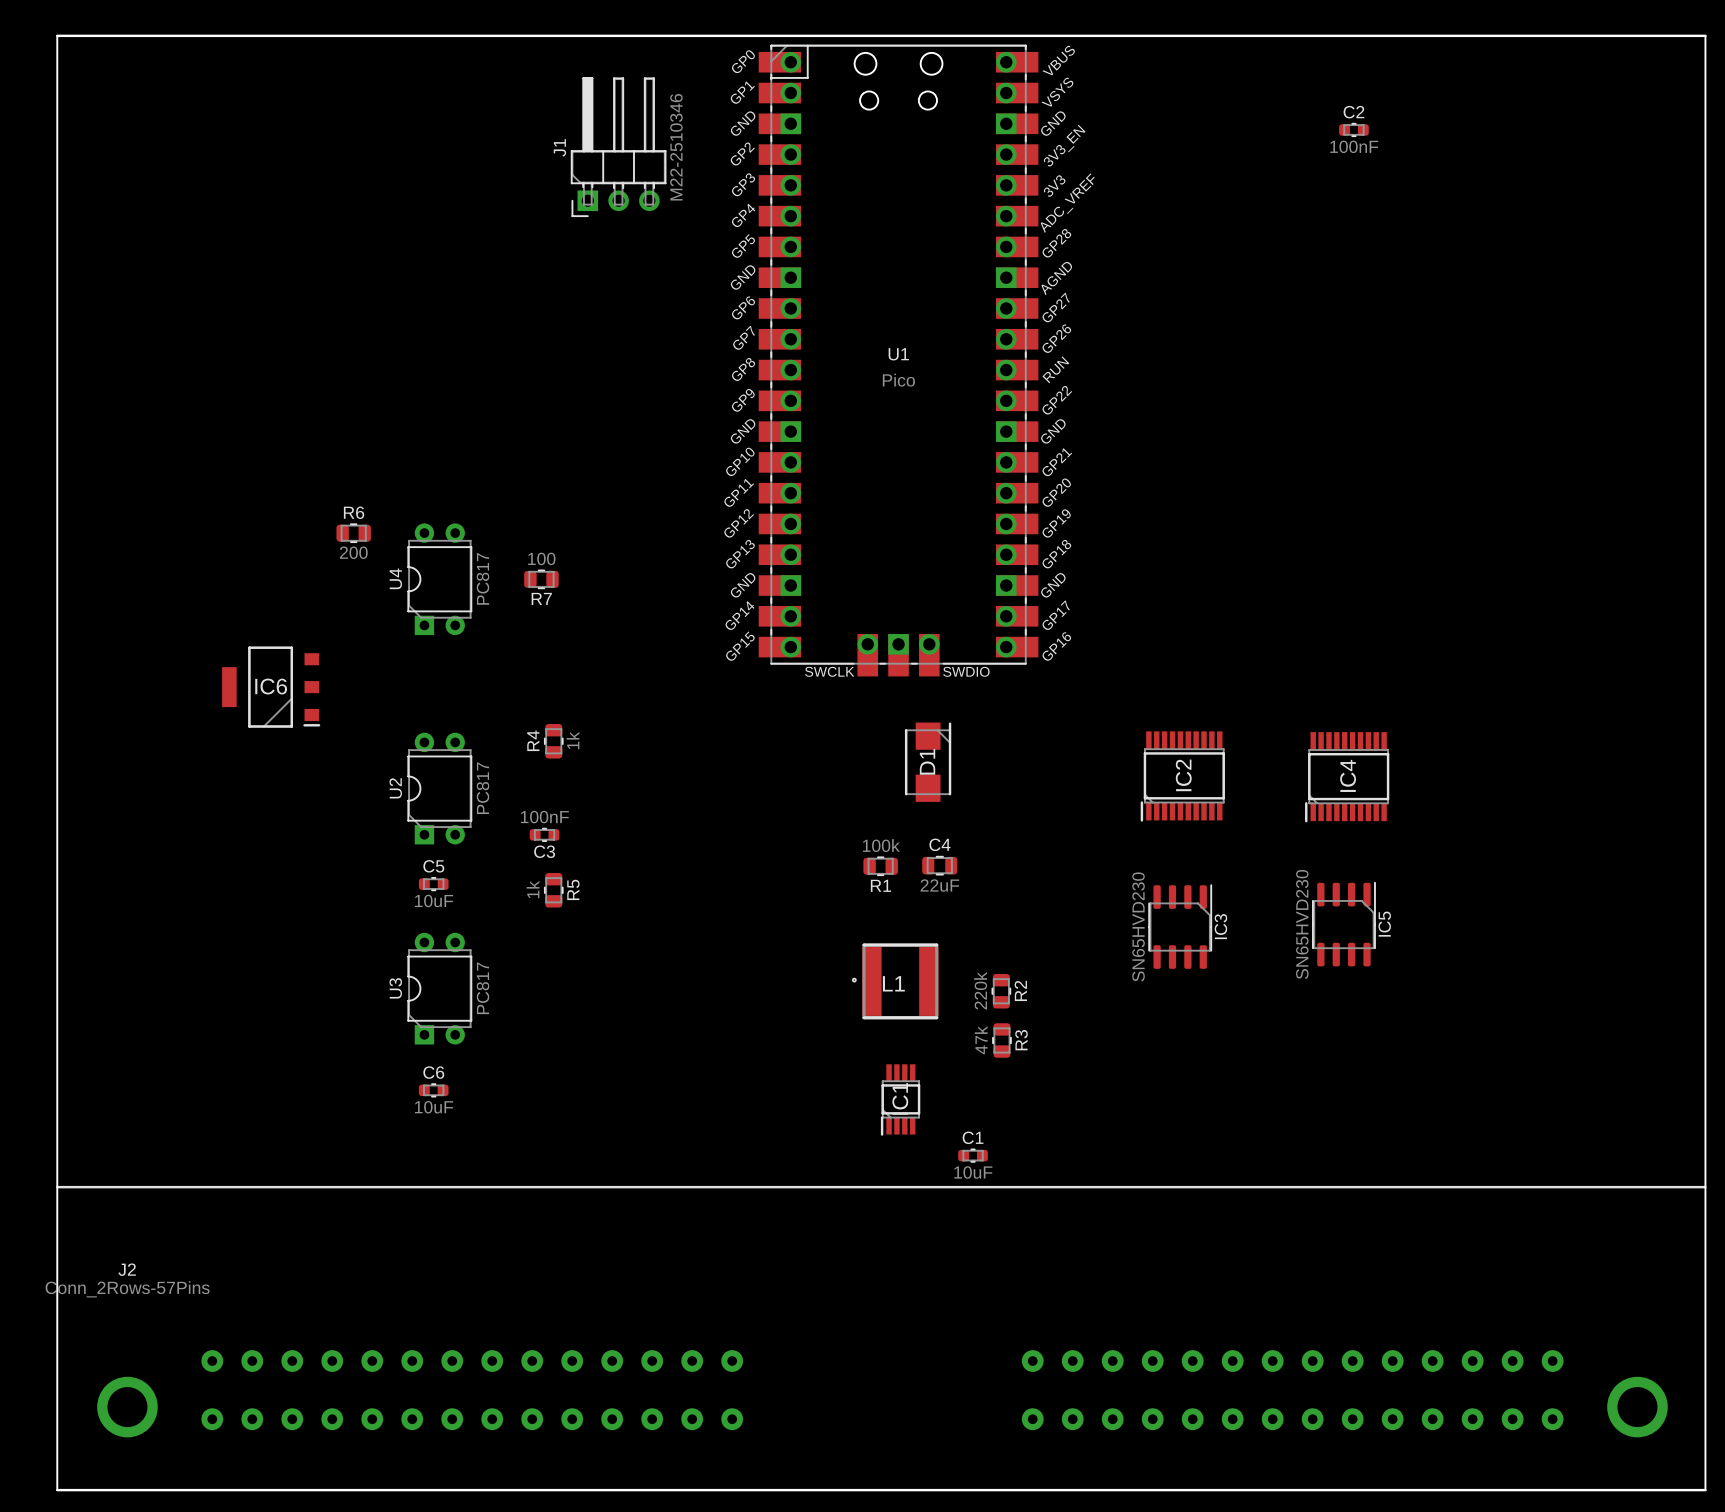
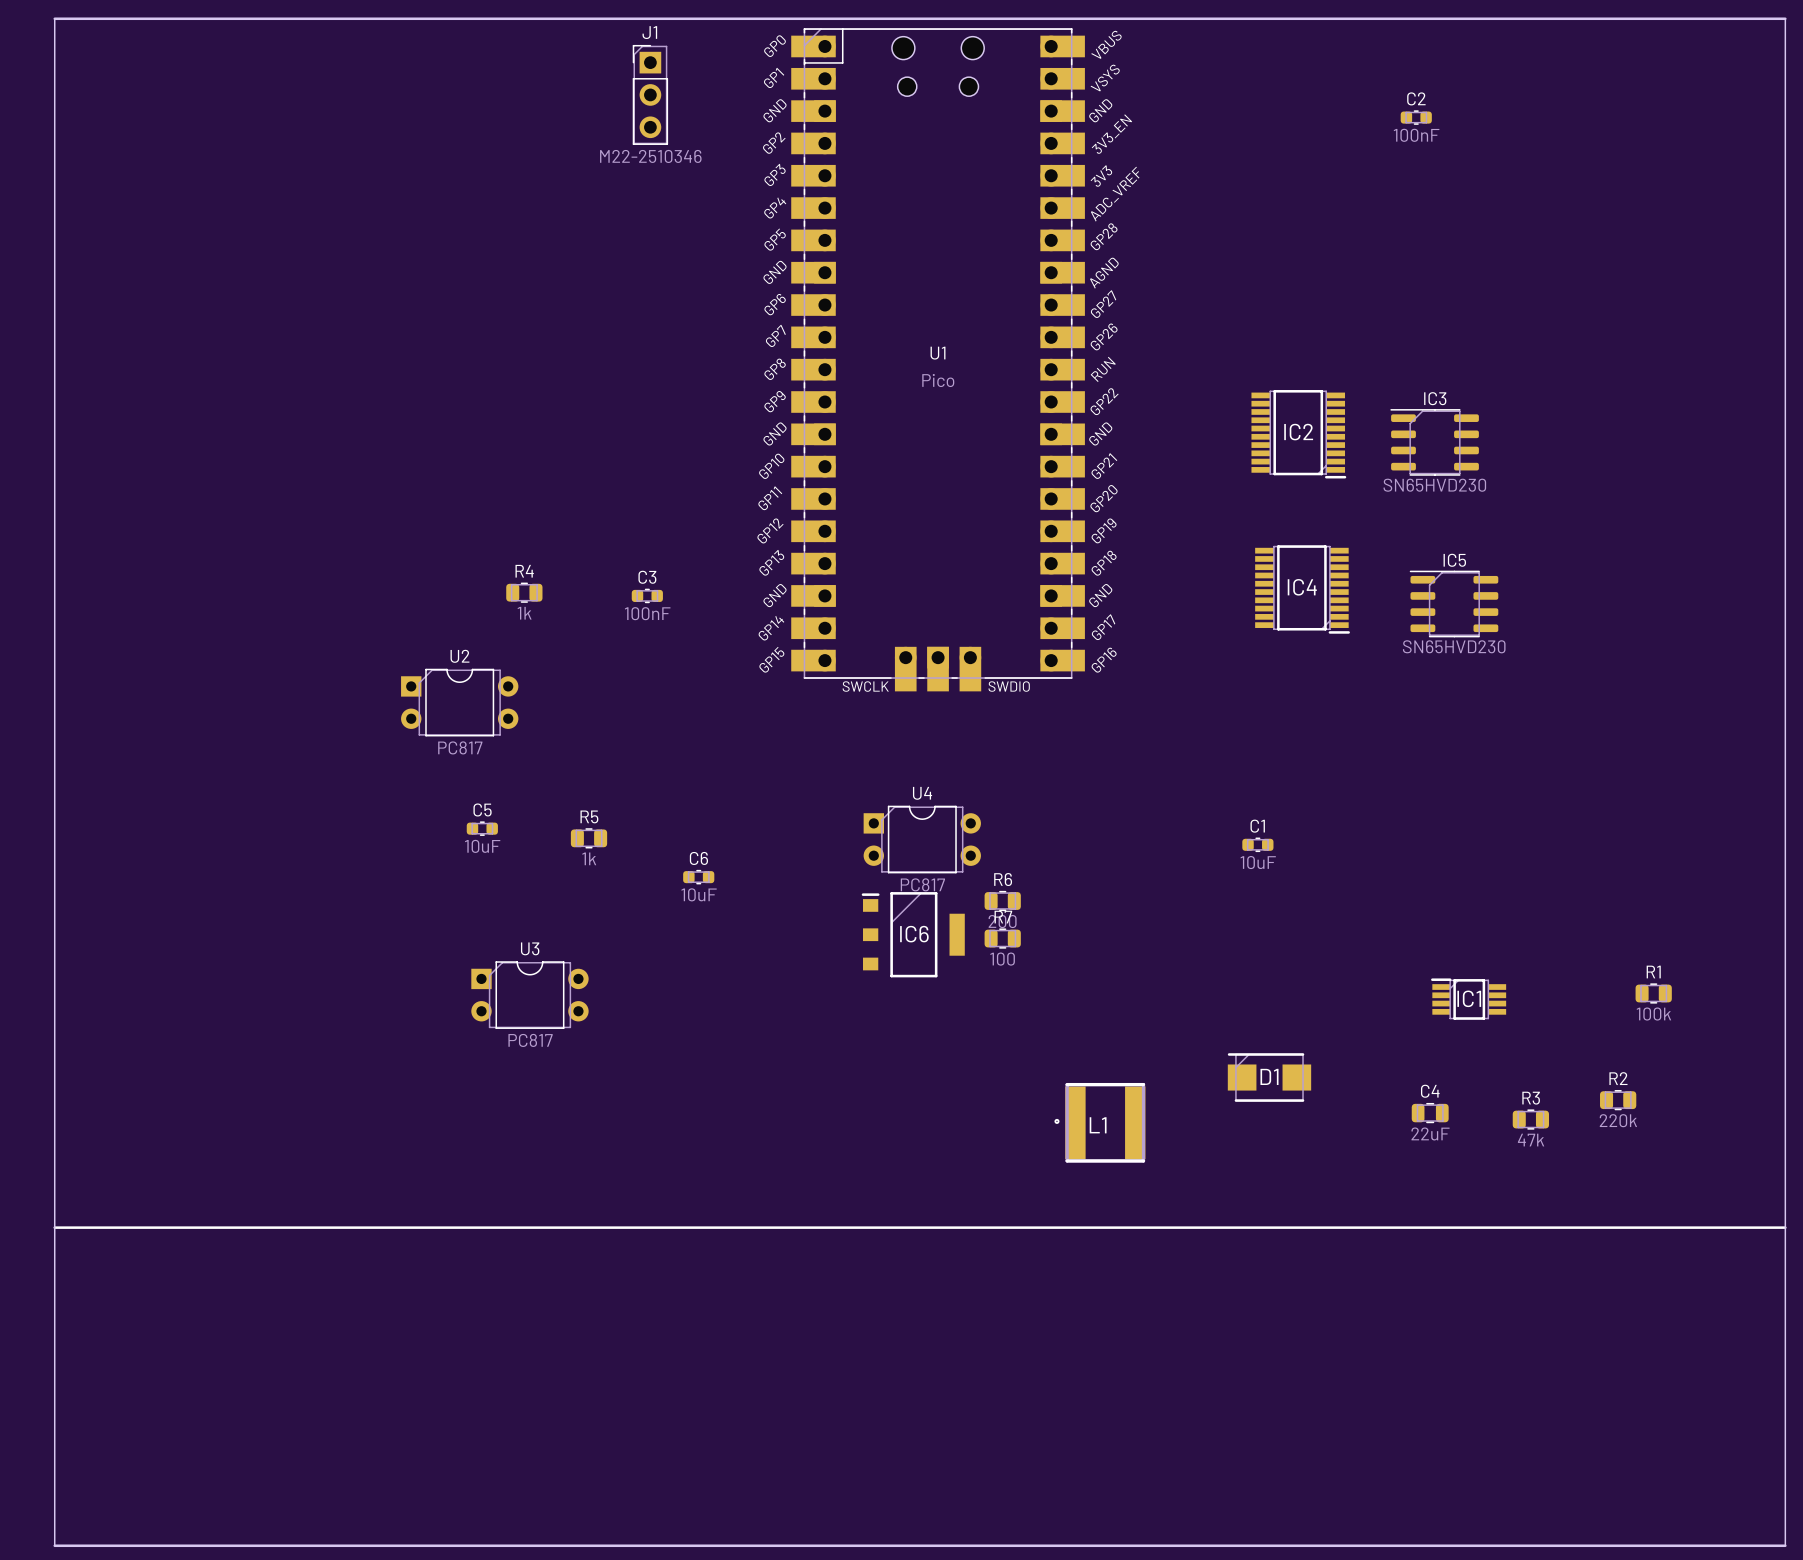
J1 footprint: [570, 77, 667, 217] -> [632, 44, 669, 145]
J1 name position: J1 (559, 147) -> J1 (649, 32)
J1 value position: M22-2510346 (676, 147) -> M22-2510346 (650, 156)
R6 position: (353, 533) -> (1002, 901)
R7 value position: 100 (541, 558) -> 100 (1002, 959)
U4 rotation: 0° (439, 579) -> 90° clockwise (922, 839)
U4 position: (439, 579) -> (922, 839)
R7 position: (541, 579) -> (1002, 938)
R7 name position: R7 (541, 598) -> R7 (1003, 917)
IC6 rotation: 0° (271, 687) -> 180° (913, 934)
IC6 position: (271, 687) -> (913, 934)
R4 rotation: 0° (553, 741) -> 90° clockwise (524, 592)
R4 position: (553, 741) -> (524, 592)
D1 rotation: 0° (928, 762) -> 90° counterclockwise (1269, 1077)
D1 position: (928, 762) -> (1269, 1077)
IC2 rotation: 0° (1182, 776) -> 90° counterclockwise (1298, 434)
IC2 position: (1182, 776) -> (1298, 434)
IC4 rotation: 0° (1347, 777) -> 90° counterclockwise (1302, 589)
IC4 position: (1347, 777) -> (1302, 589)
U2 rotation: 0° (439, 788) -> 90° clockwise (459, 702)
U2 position: (439, 788) -> (459, 702)
C3 value position: 100nF (544, 817) -> 100nF (647, 613)
C3 position: (544, 834) -> (647, 595)
R1 value position: 100k (881, 845) -> 100k (1653, 1014)
C3 name position: C3 (544, 851) -> C3 (647, 577)
C4 position: (939, 865) -> (1430, 1113)
R1 position: (880, 866) -> (1653, 993)
C5 position: (433, 884) -> (482, 828)
R1 name position: R1 (880, 885) -> R1 (1653, 972)
R5 value position: 1k (533, 889) -> 1k (589, 858)
R5 name position: R5 (573, 889) -> R5 (589, 816)
R5 rotation: 0° (553, 890) -> 90° clockwise (589, 838)
R5 position: (553, 890) -> (589, 838)
IC5 rotation: 0° (1343, 924) -> 90° counterclockwise (1454, 604)
IC5 position: (1343, 924) -> (1454, 604)
IC3 rotation: 0° (1180, 926) -> 90° counterclockwise (1434, 442)
IC3 position: (1180, 926) -> (1434, 442)
L1 position: (895, 981) -> (1099, 1122)
U3 rotation: 0° (439, 988) -> 90° clockwise (529, 995)
U3 position: (439, 988) -> (529, 995)
R2 value position: 220k (980, 990) -> 220k (1618, 1120)
R2 name position: R2 (1020, 990) -> R2 (1618, 1078)
R2 rotation: 0° (1001, 991) -> 90° clockwise (1618, 1100)
R2 position: (1001, 991) -> (1618, 1100)
R3 value position: 47k (981, 1040) -> 47k (1531, 1140)
R3 rotation: 0° (1001, 1040) -> 90° clockwise (1530, 1119)
R3 position: (1001, 1040) -> (1530, 1119)
R3 name position: R3 (1021, 1040) -> R3 (1531, 1098)
C6 position: (433, 1090) -> (698, 877)
IC1 rotation: 0° (900, 1100) -> 90° clockwise (1468, 999)
IC1 position: (900, 1100) -> (1468, 999)
C1 position: (973, 1155) -> (1257, 844)
J2: Conn_2Rows-57Pins (882, 1393) -> none

